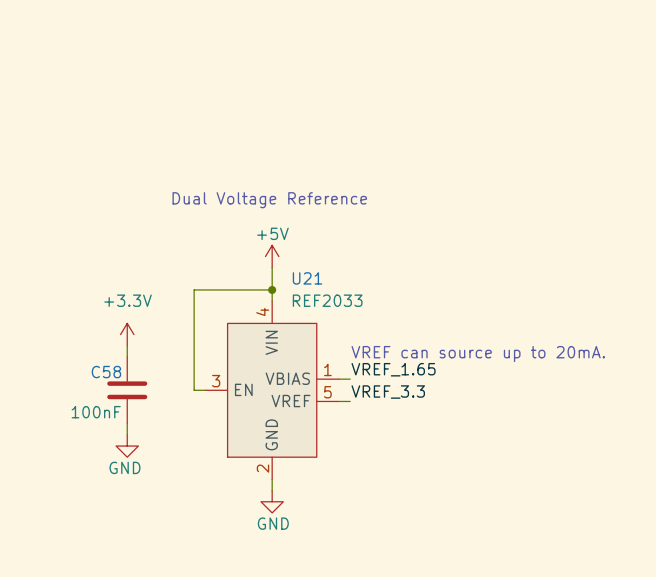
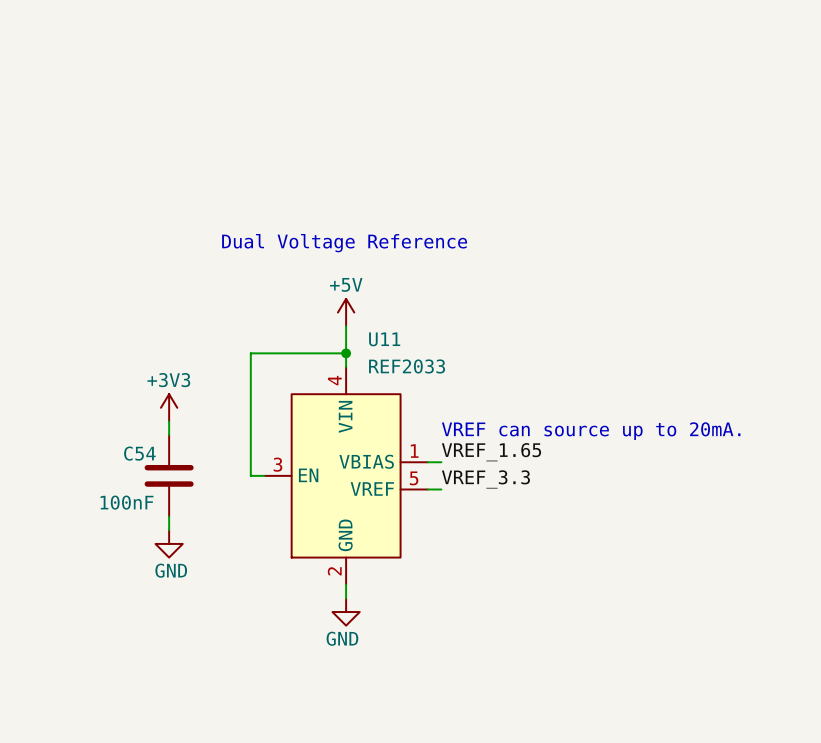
U21 name: U21 (307, 278) -> U11 (384, 339)
power symbol: +3.3V (127, 334) -> +3V3 (169, 407)
C58 name: C58 (106, 372) -> C54 (139, 453)

